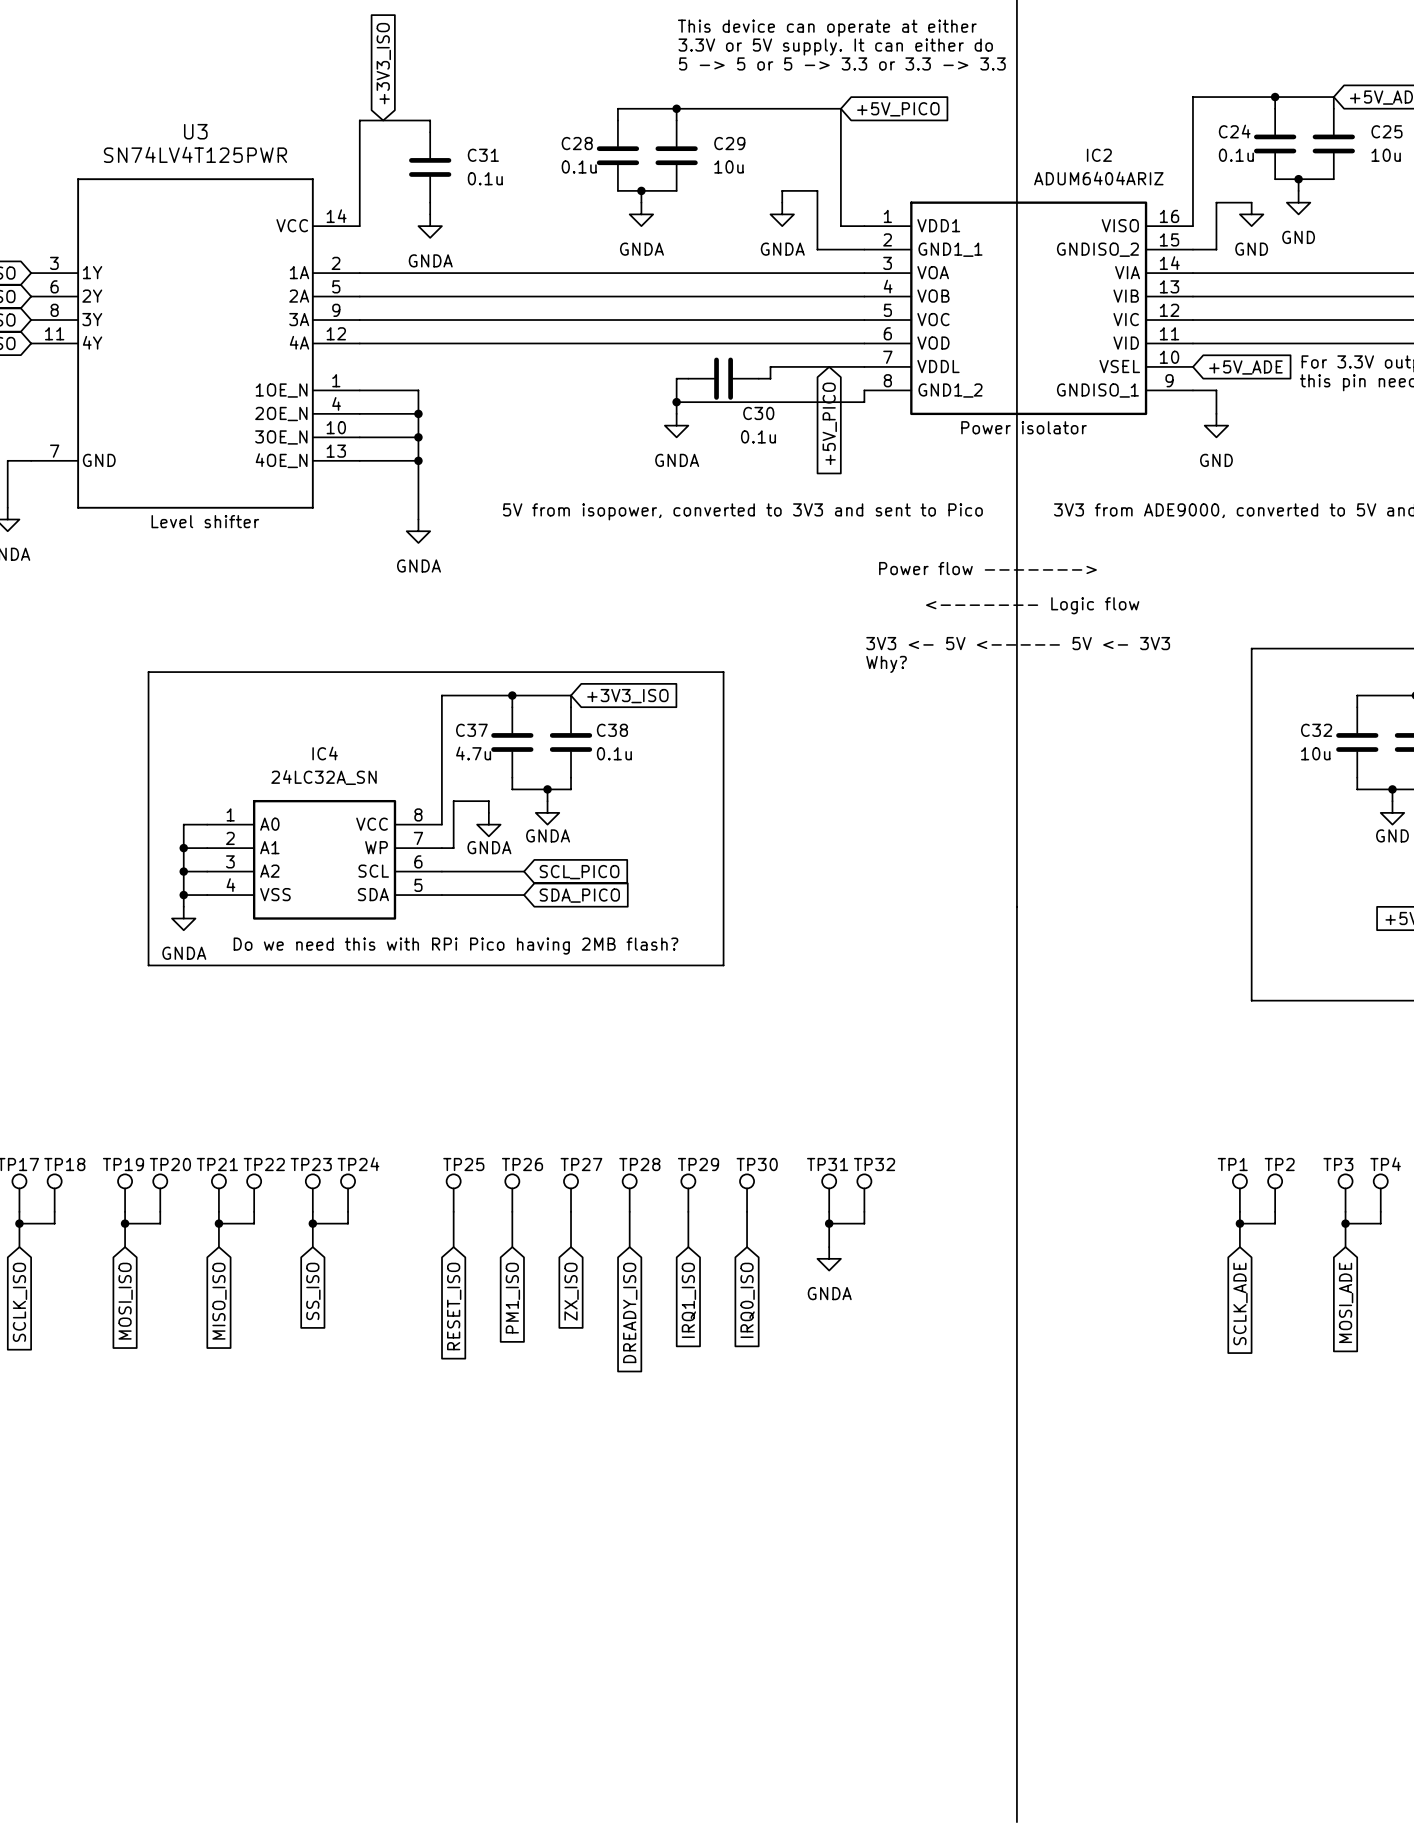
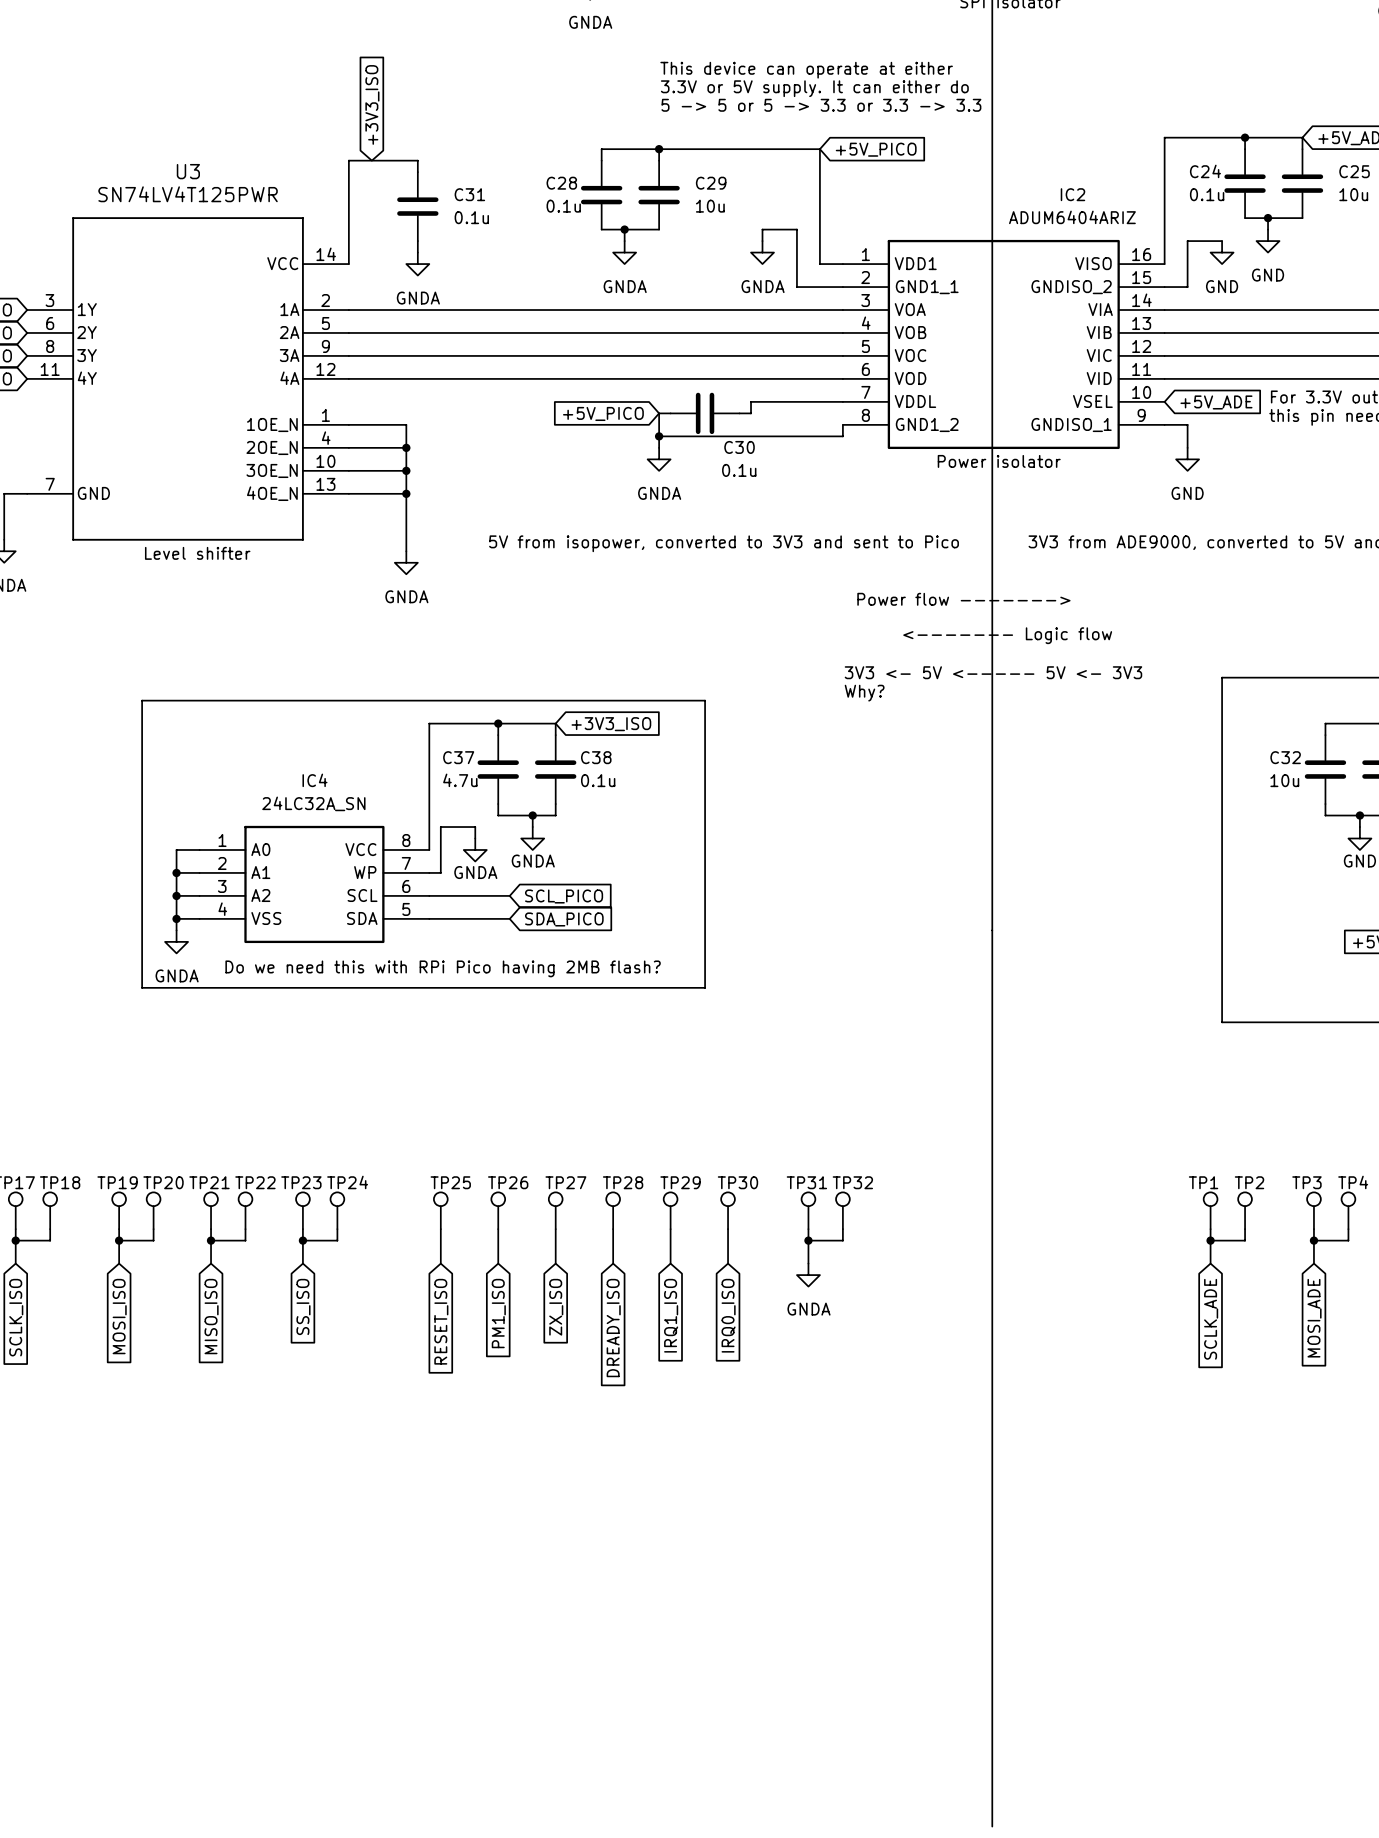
global label rotation: 0° (829, 423) -> 90° clockwise (603, 413)
global label position: +5V_PICO (829, 423) -> +5V_PICO (603, 413)

